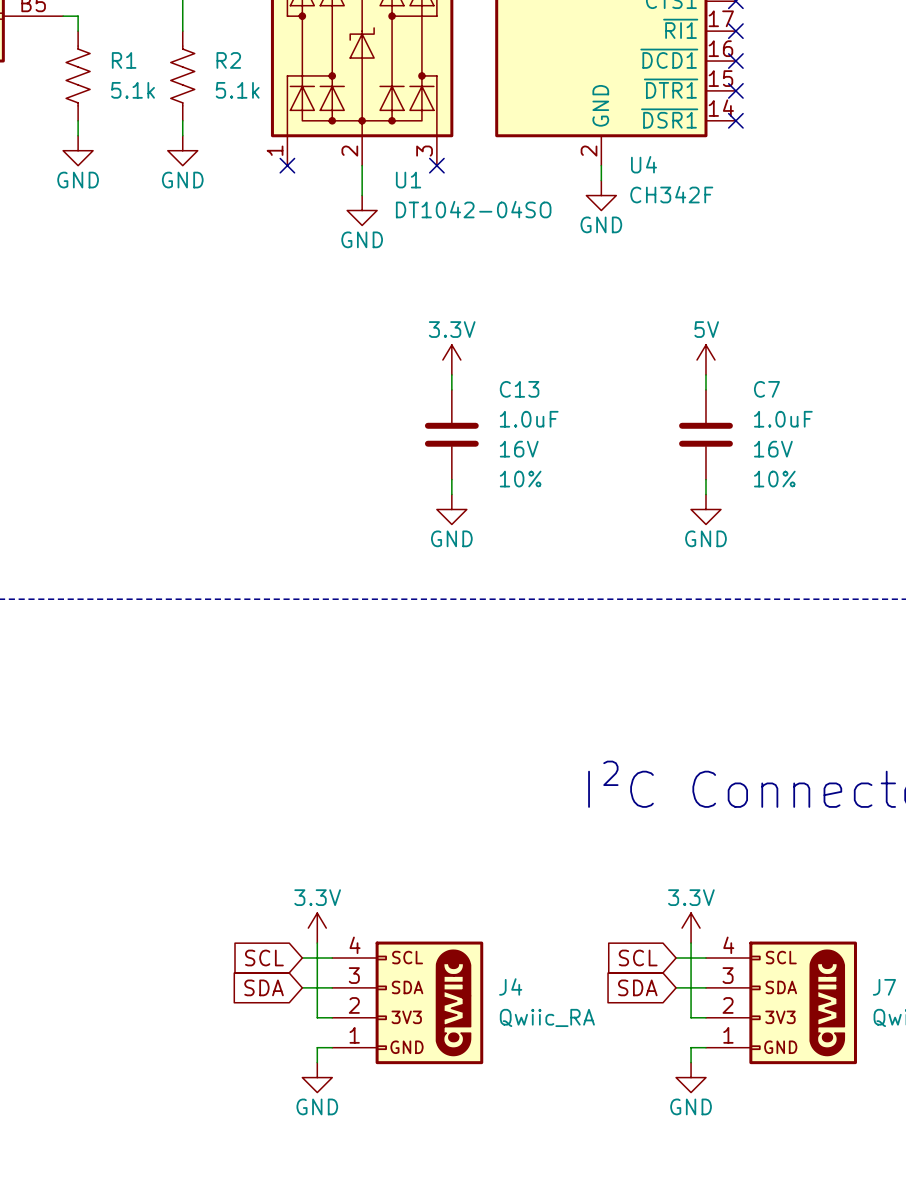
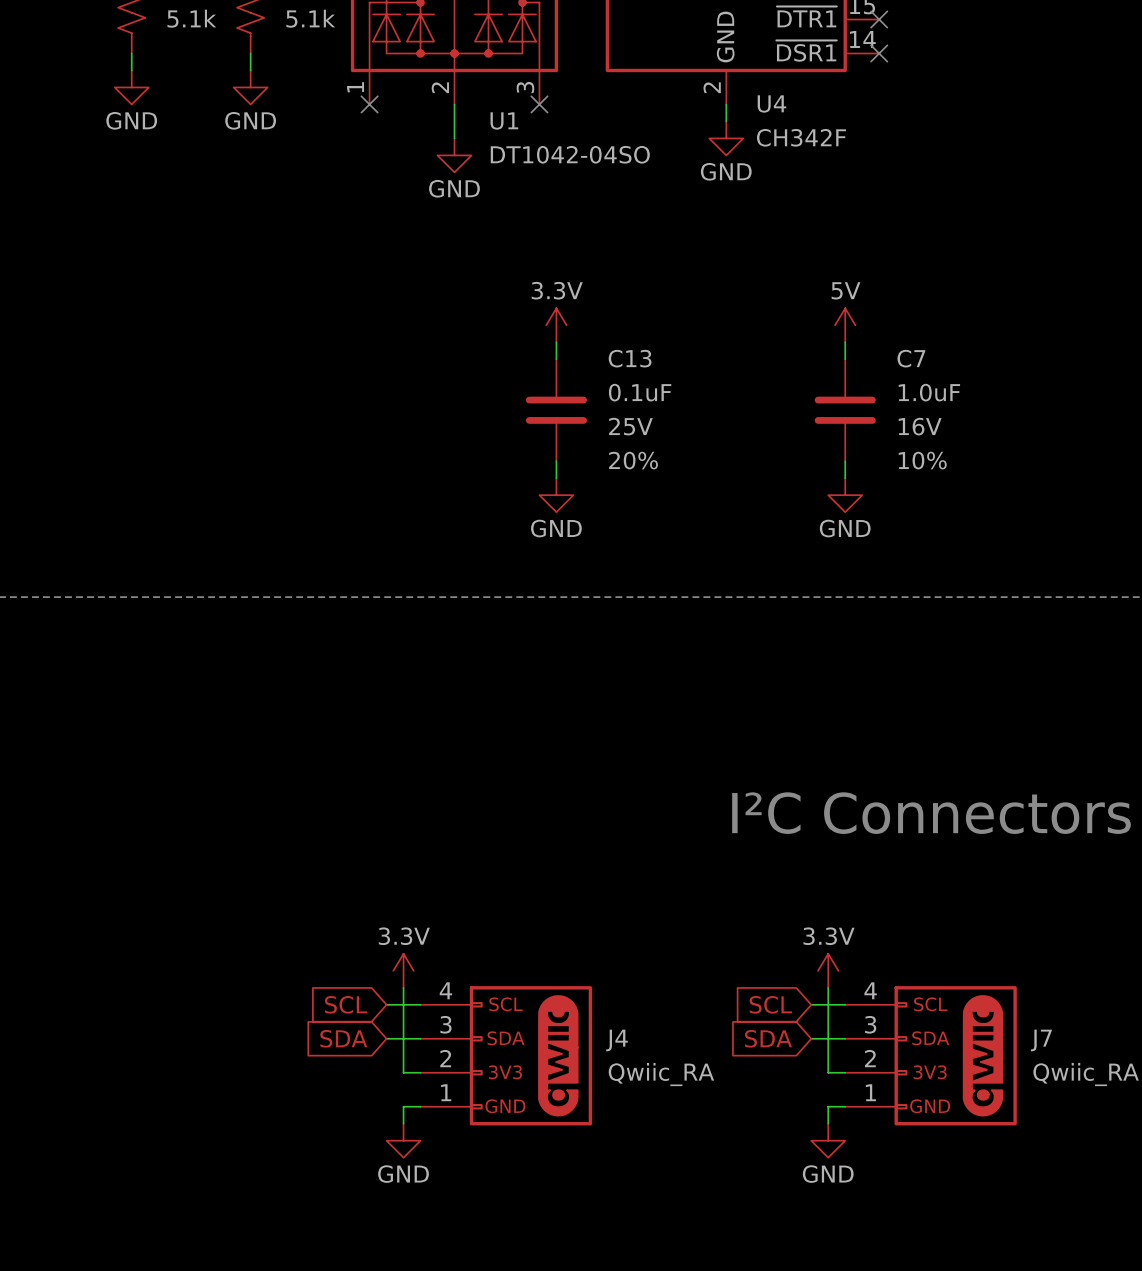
C13 value: 1.0uF (529, 419) -> 0.1uF (640, 392)
C13 text: 16V (519, 449) -> 25V (630, 426)
C13 text: 10% (520, 479) -> 20% (633, 460)

